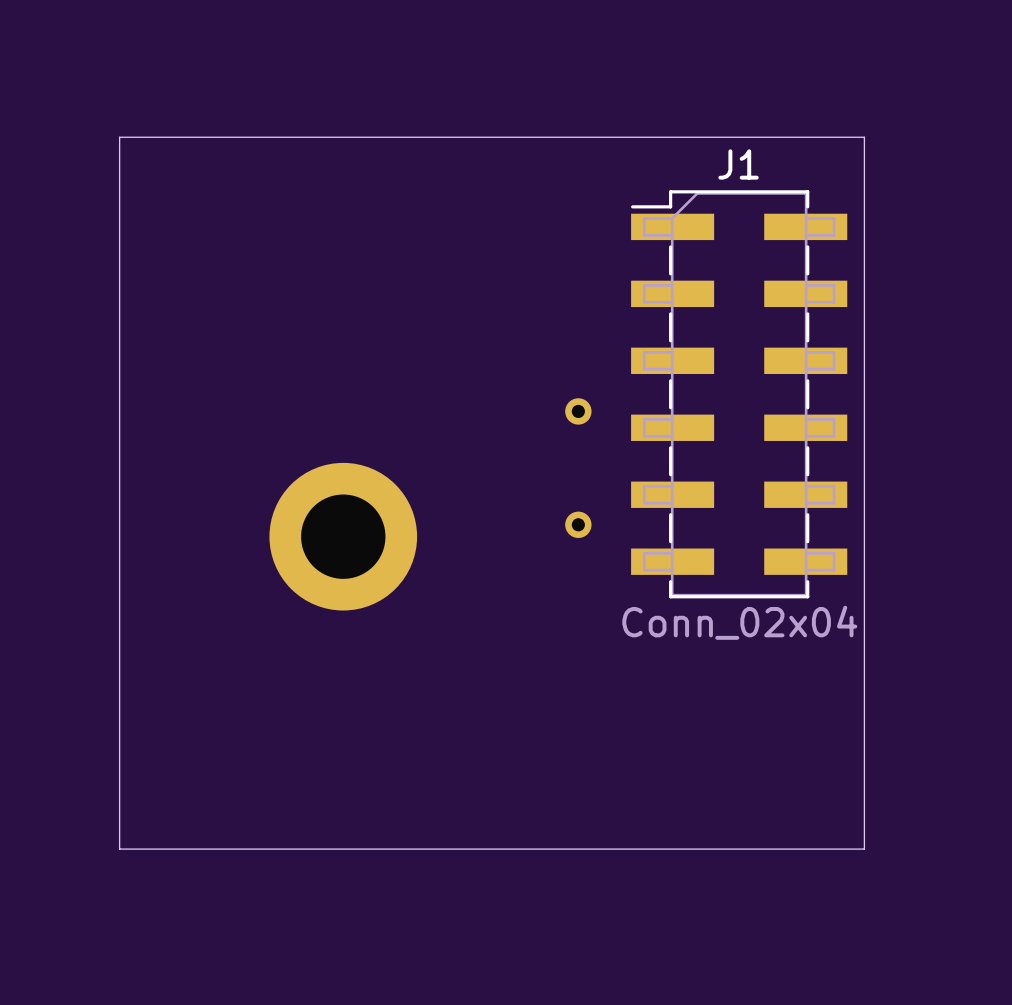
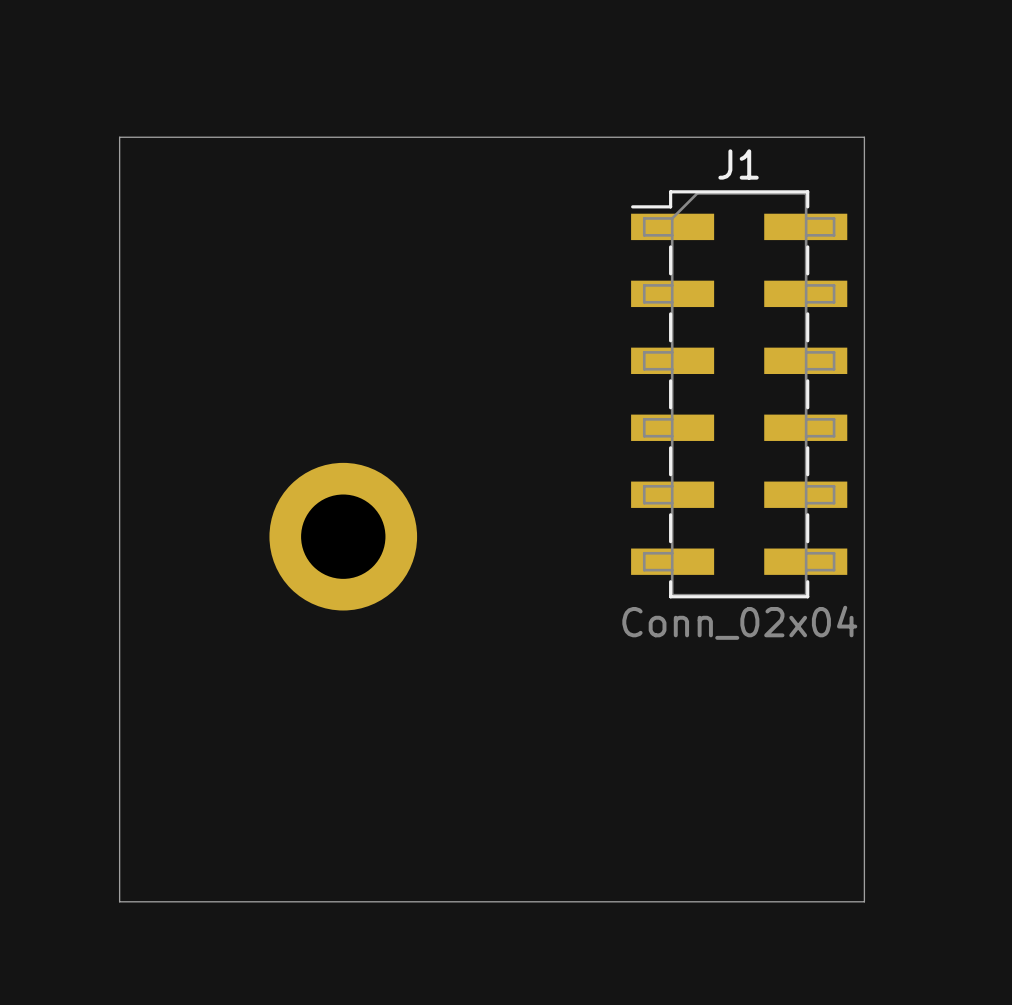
part: (578, 411) -> none
part: (578, 524) -> none
board edge: (864, 849) (119, 849) -> (864, 849) (864, 901) (119, 901) (119, 849)

